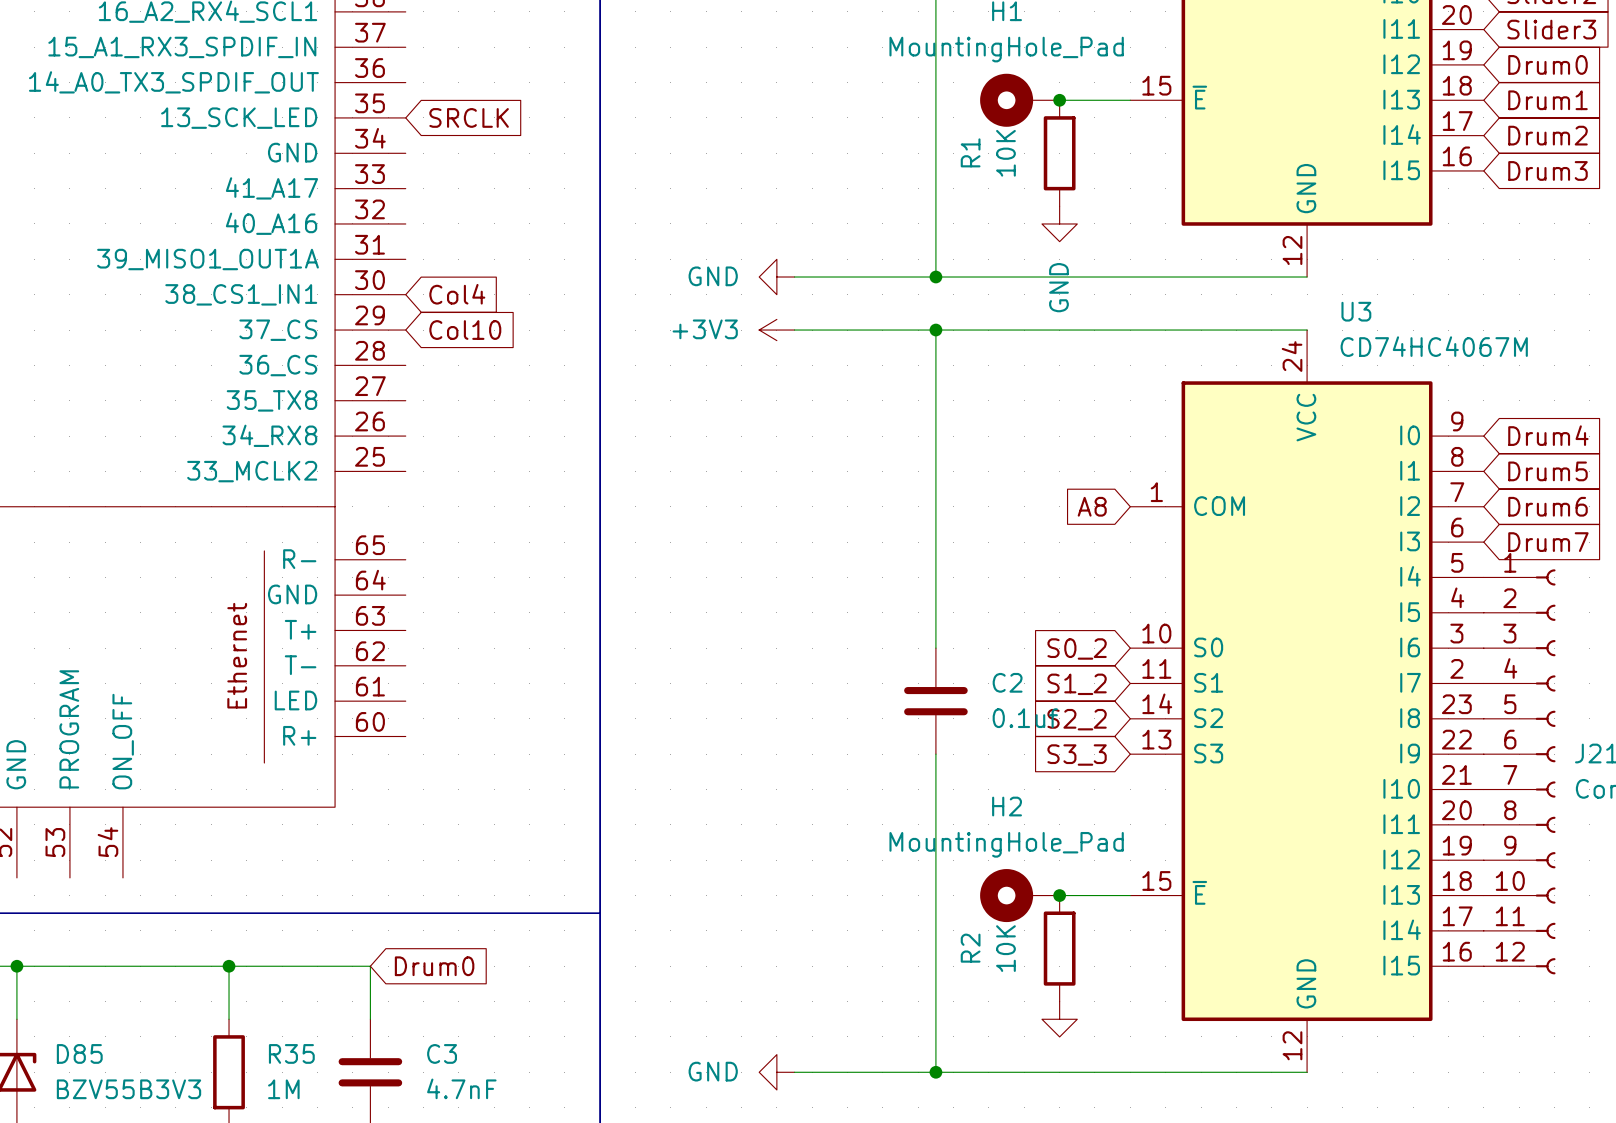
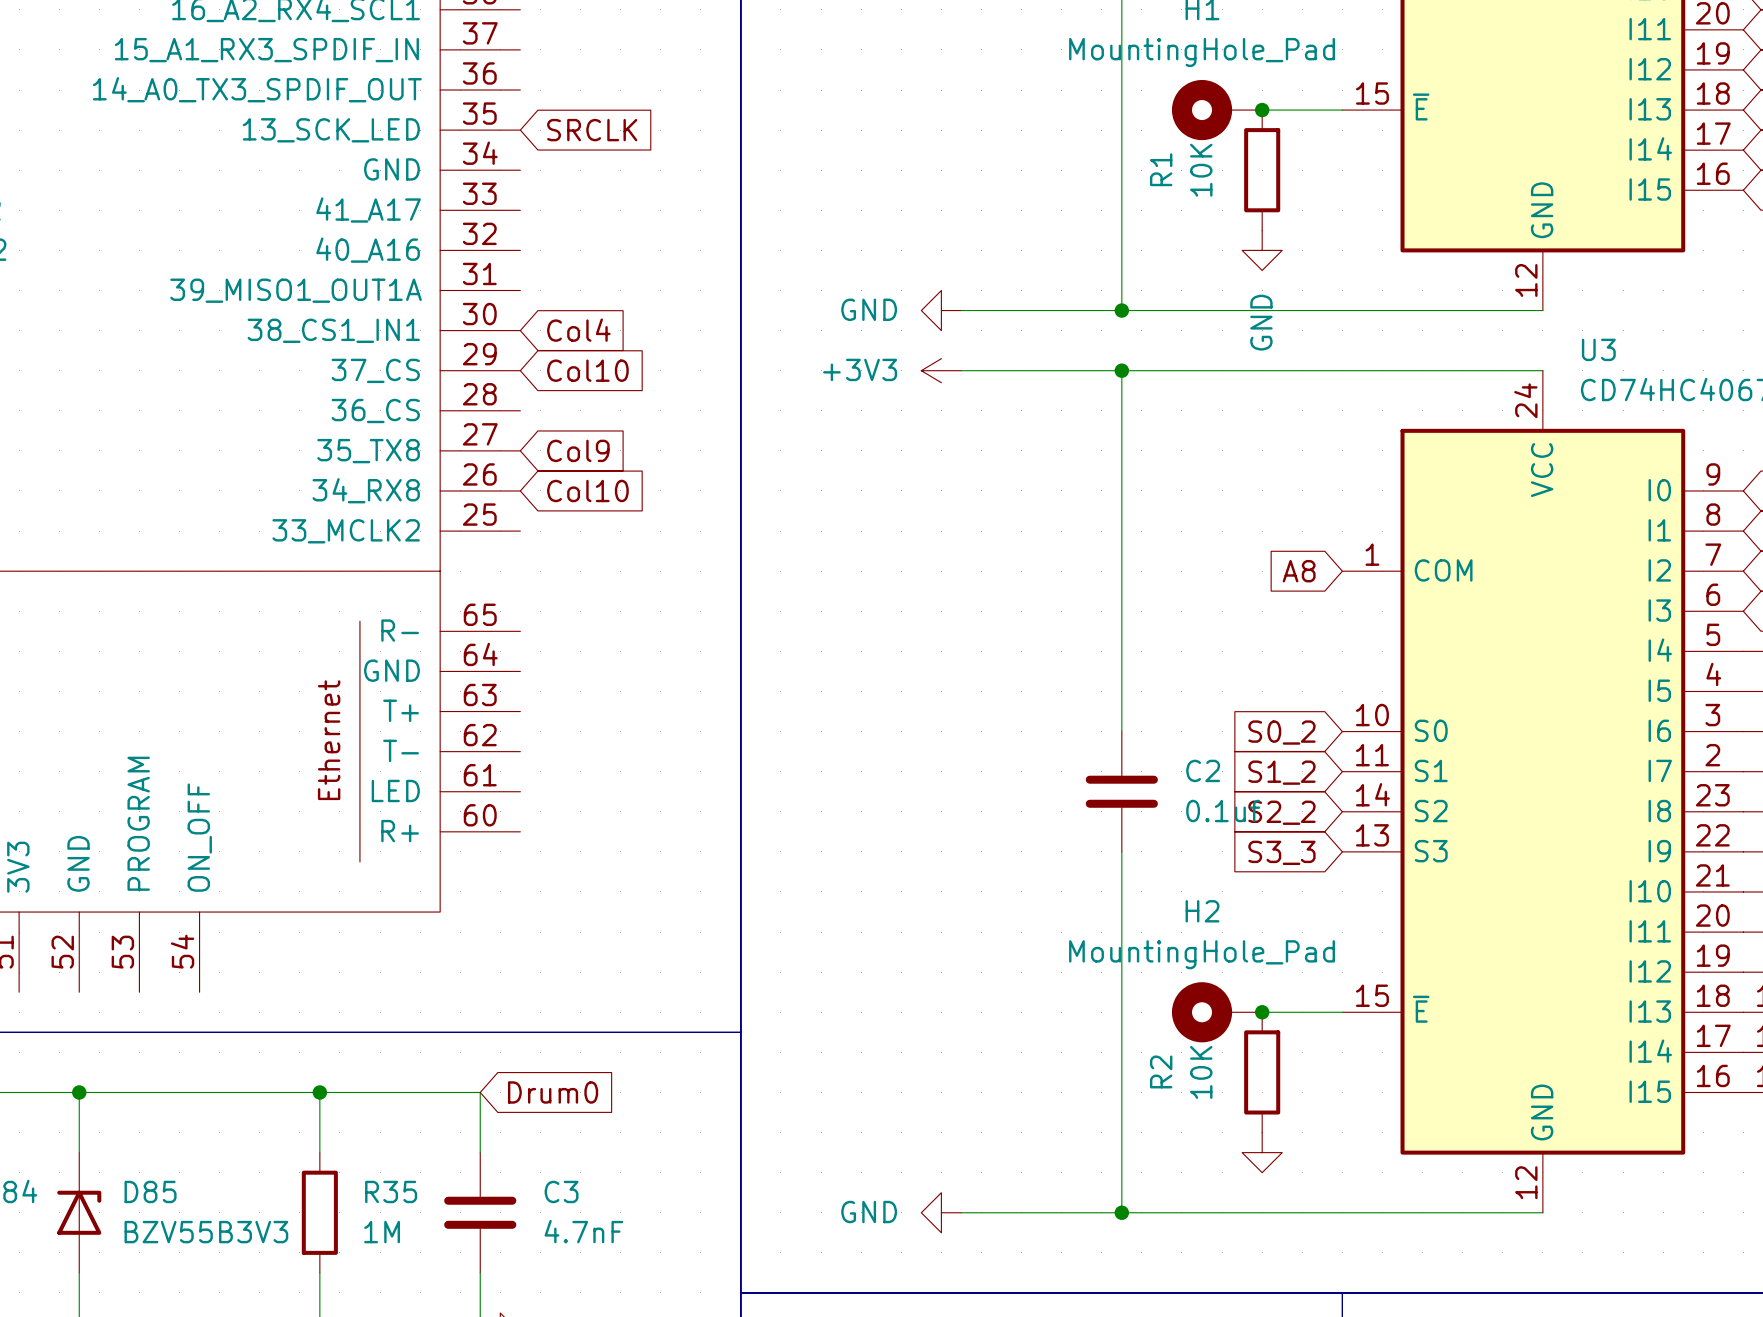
global label: none -> Col9 (578, 450)
global label: none -> Col10 (587, 490)

